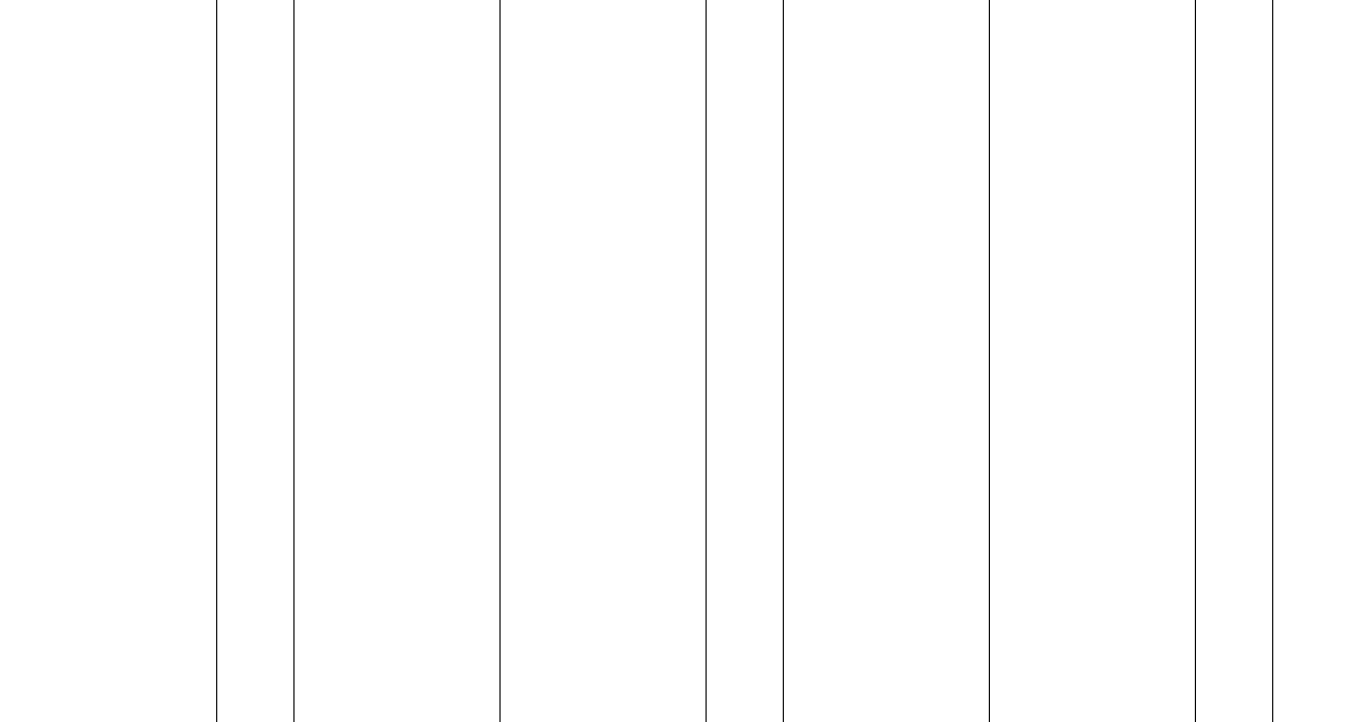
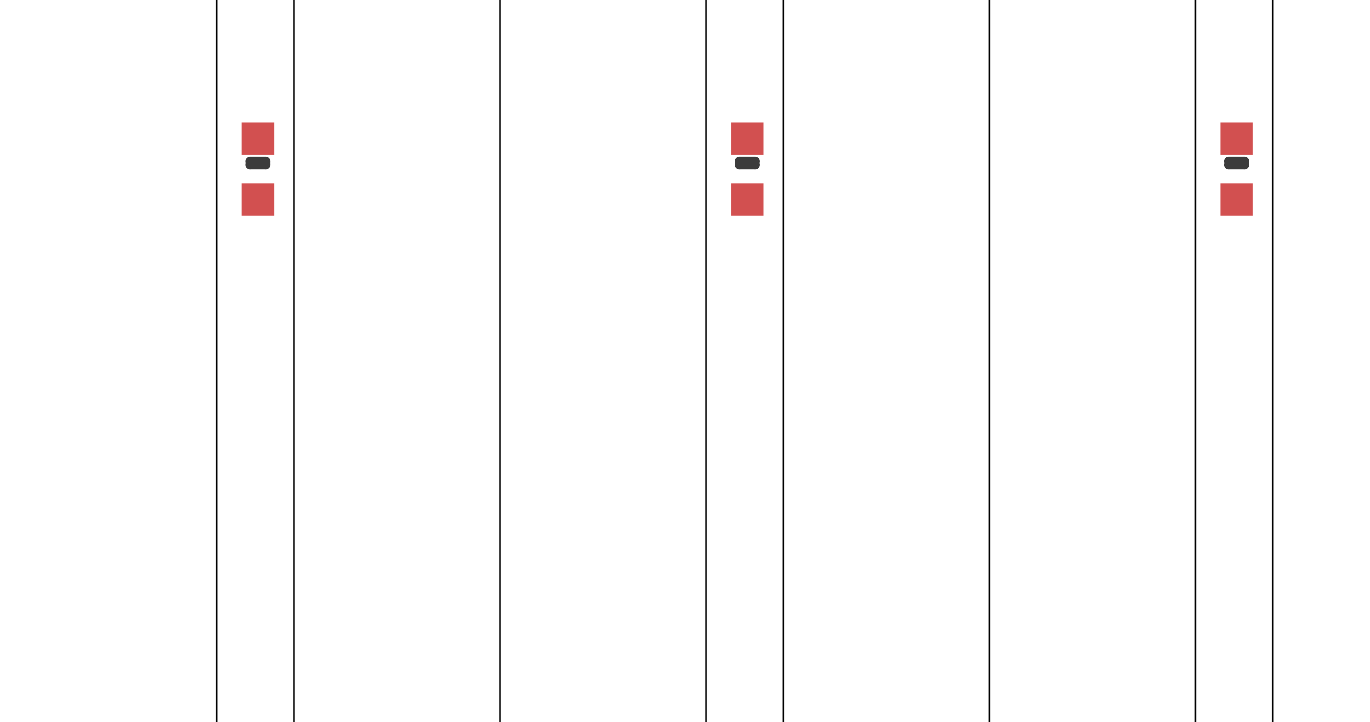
part: none -> (257, 169)
part: none -> (747, 169)
part: none -> (1236, 169)

